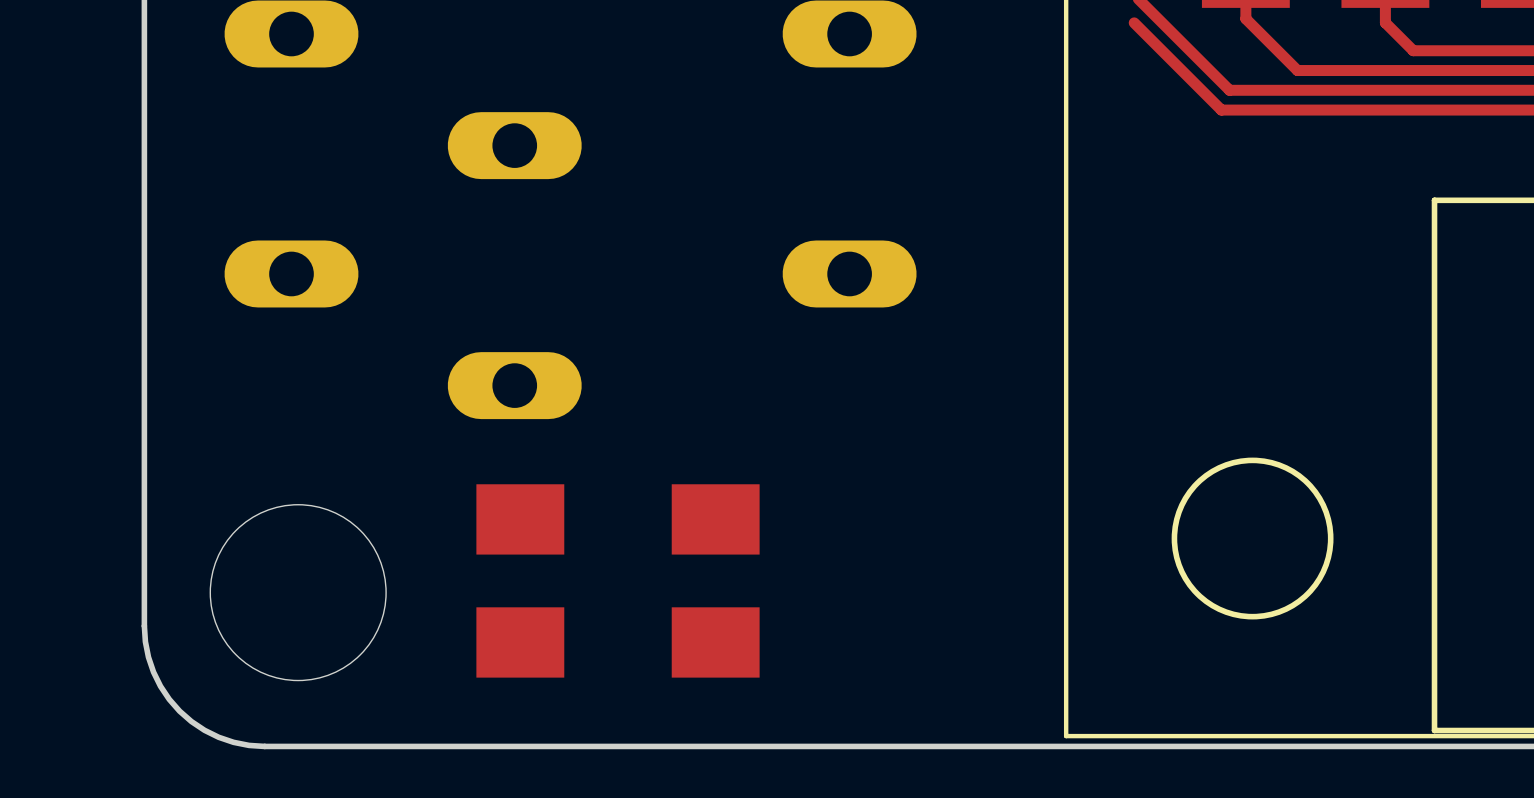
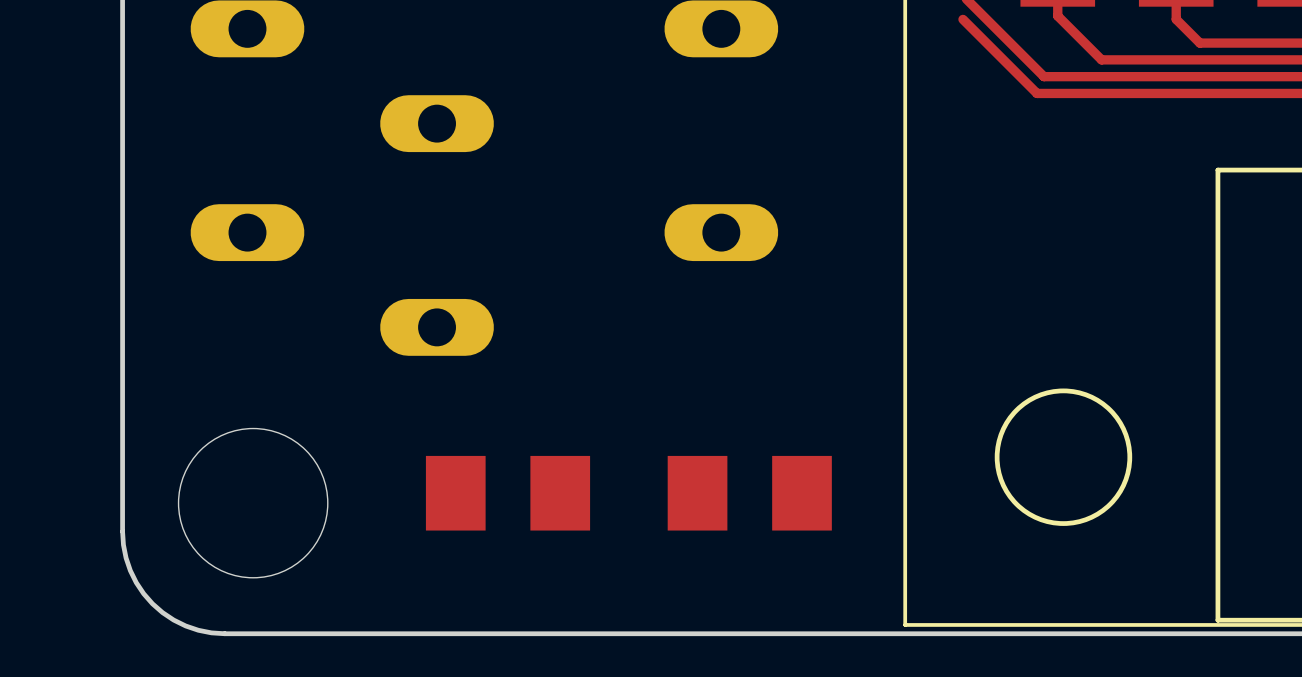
part: (520, 580) -> none
part: none -> (508, 493)
part: (715, 580) -> none
part: none -> (749, 493)

